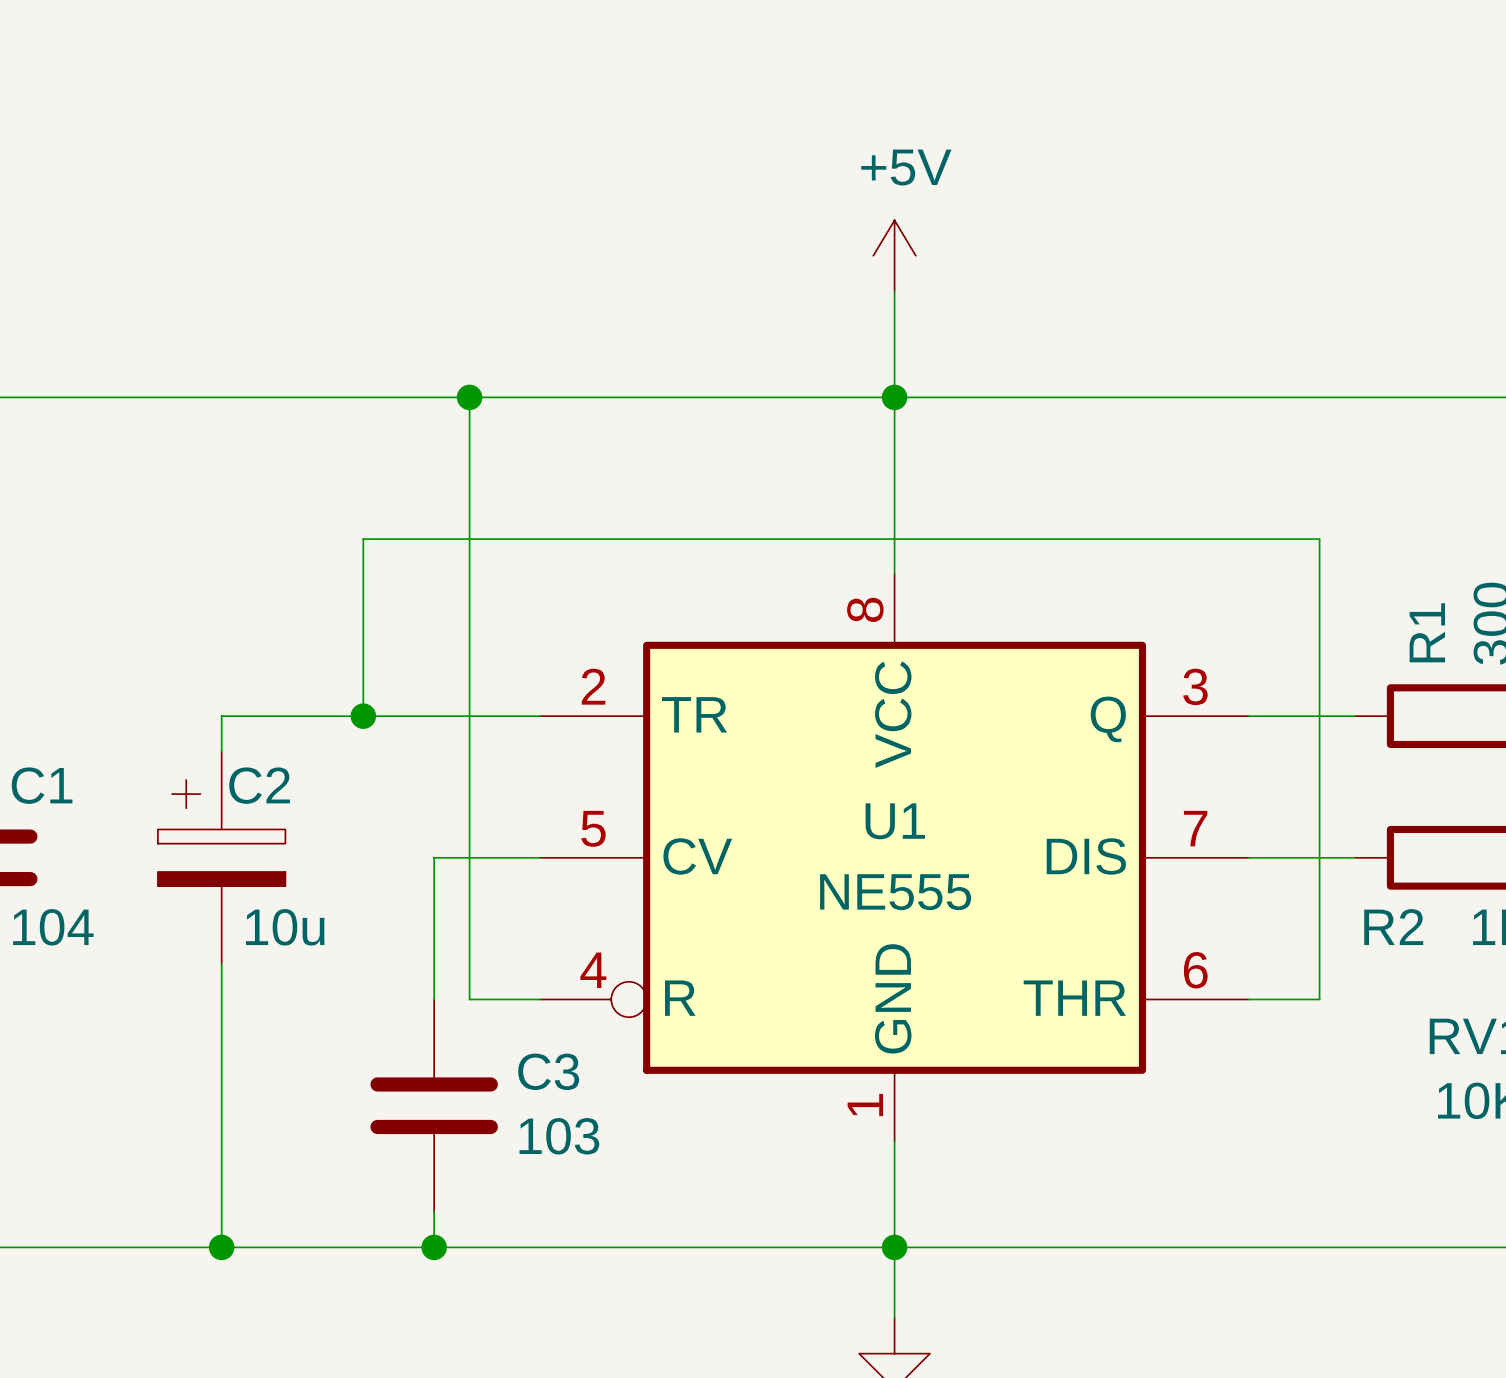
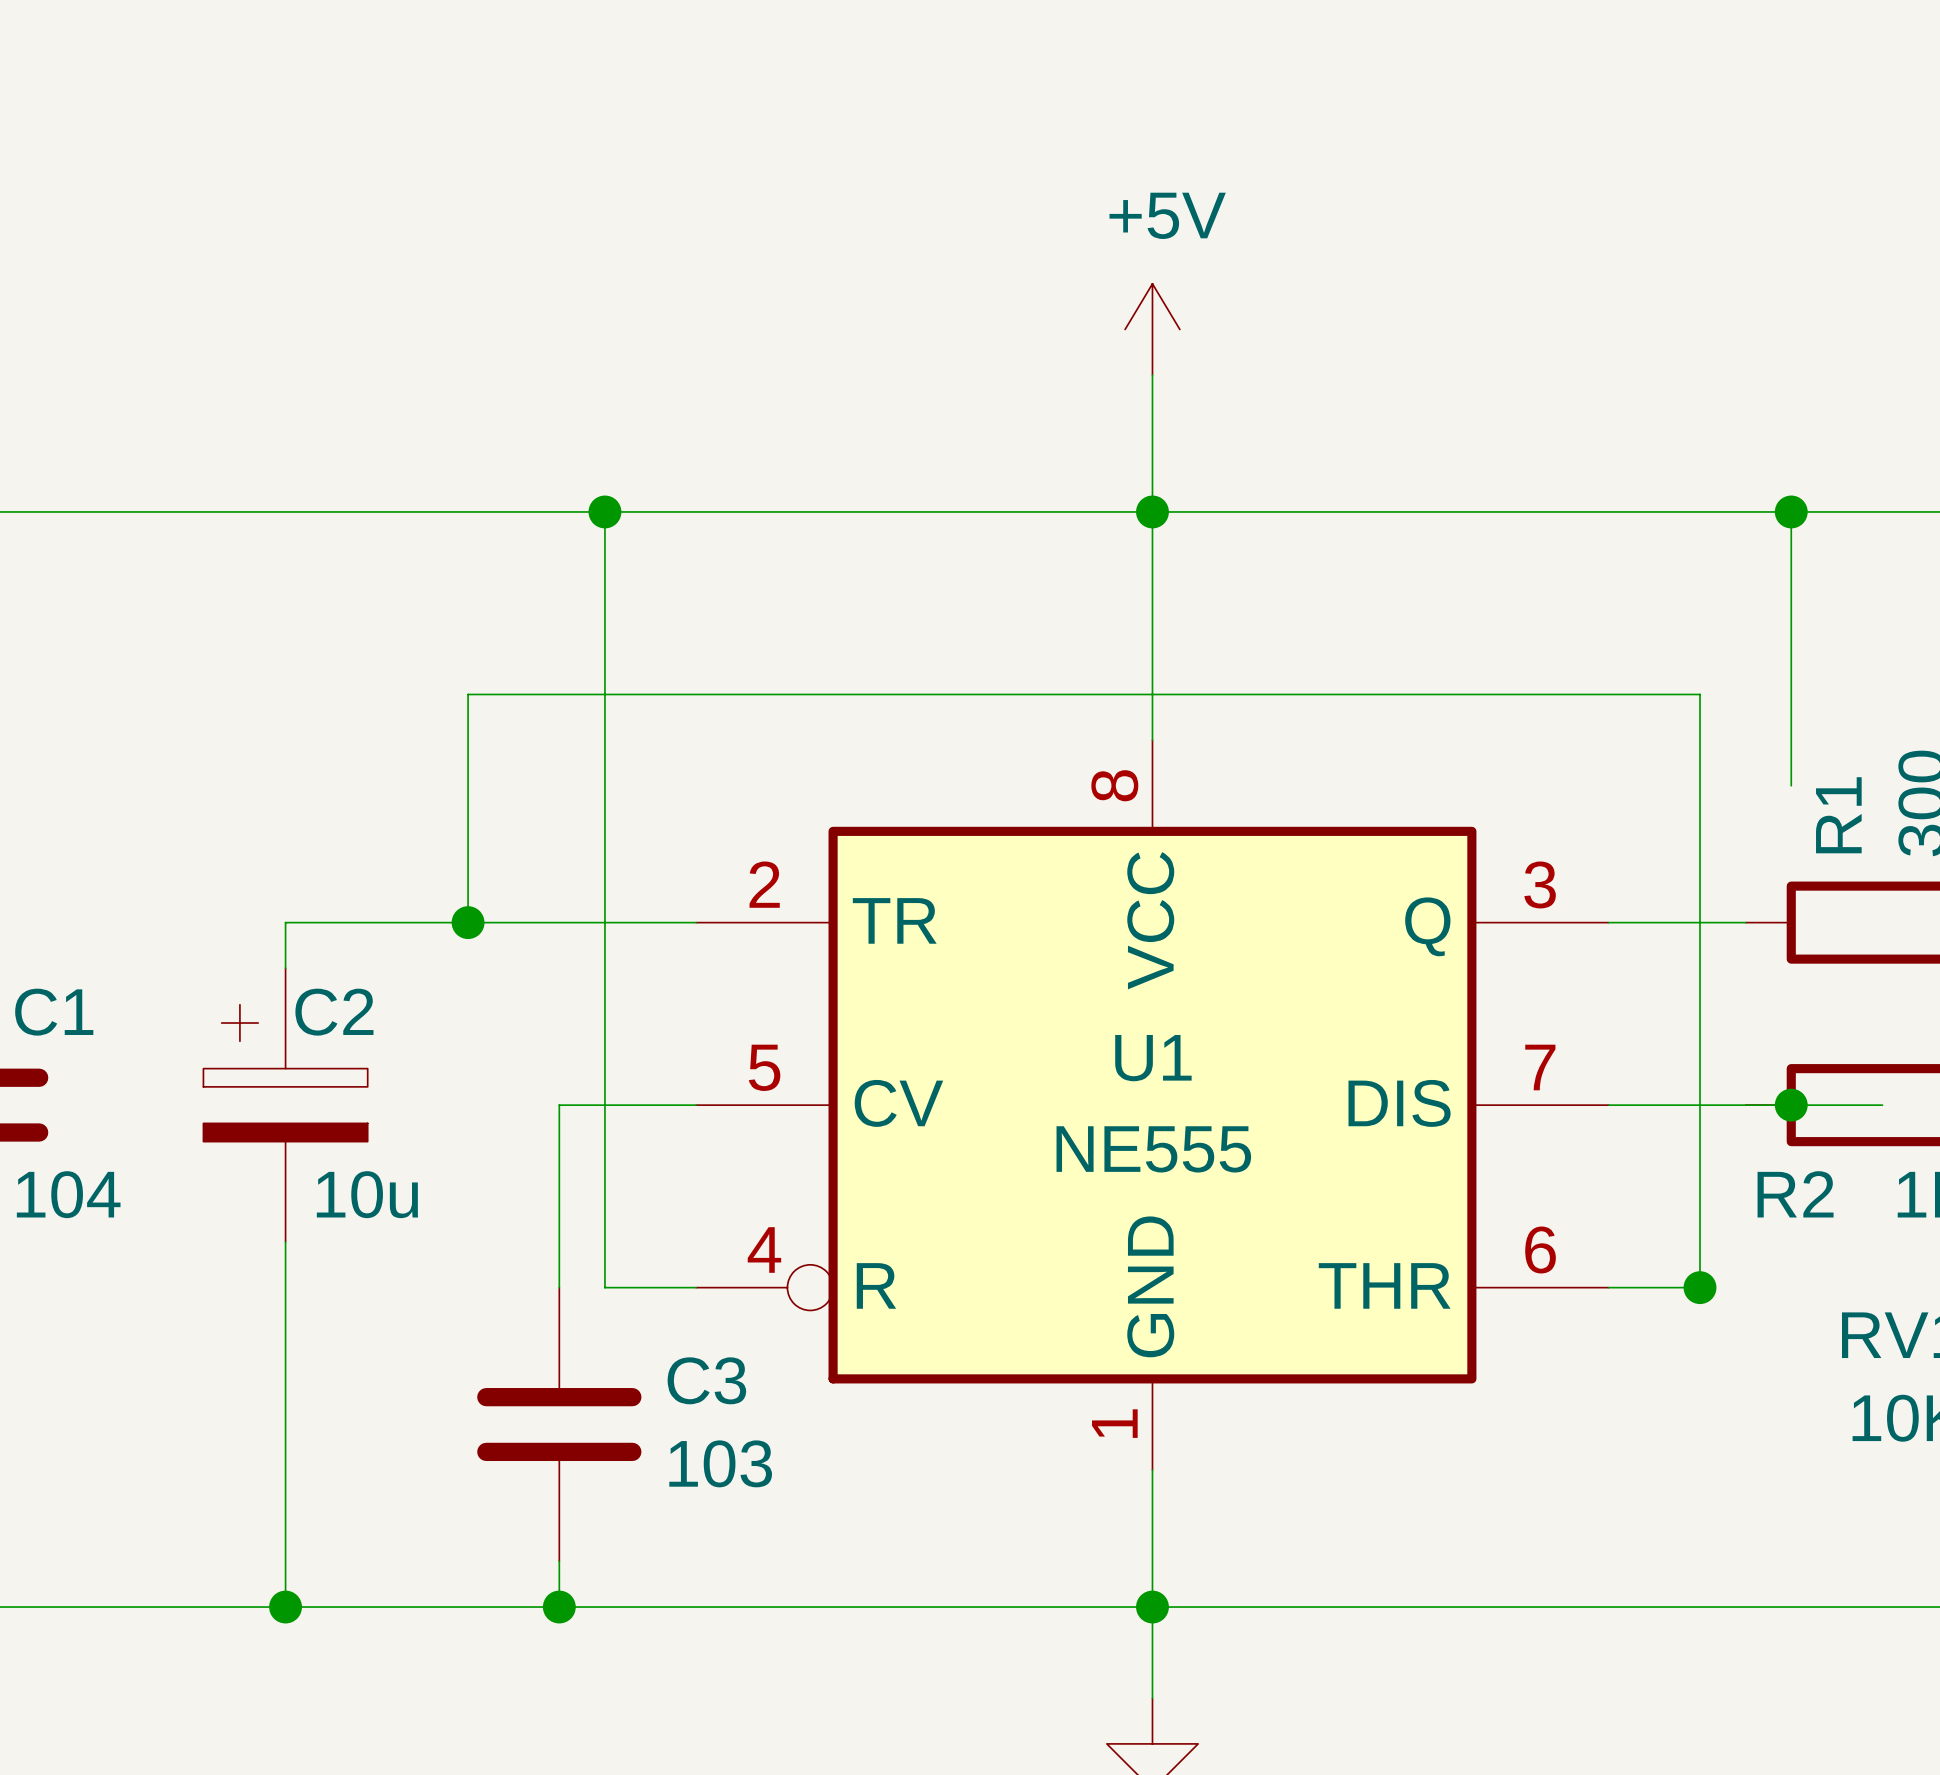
wire: none -> (1791, 511) (1791, 785)
junction: none -> (1791, 511)
wire: none -> (1745, 1105) (1882, 1105)
junction: none -> (1791, 1105)
junction: none -> (1700, 1287)

